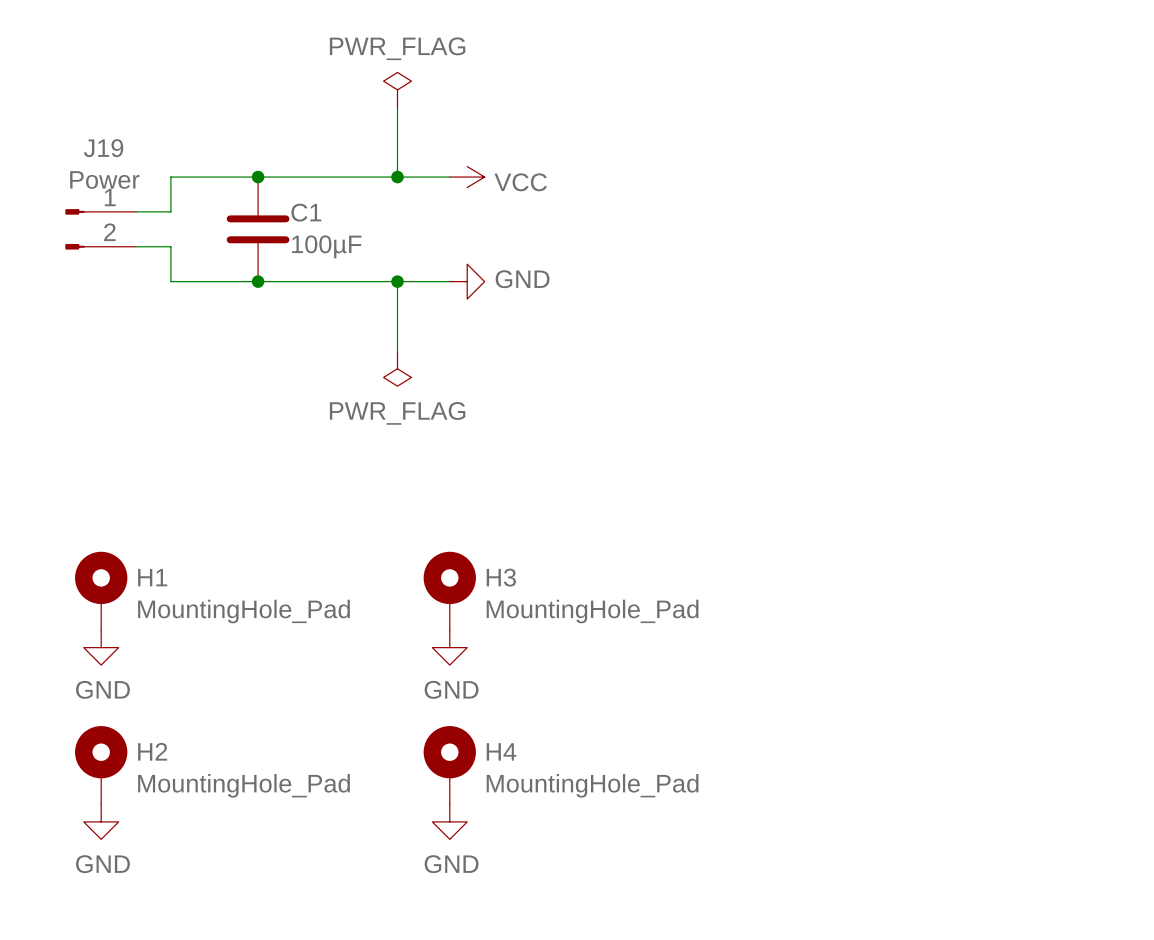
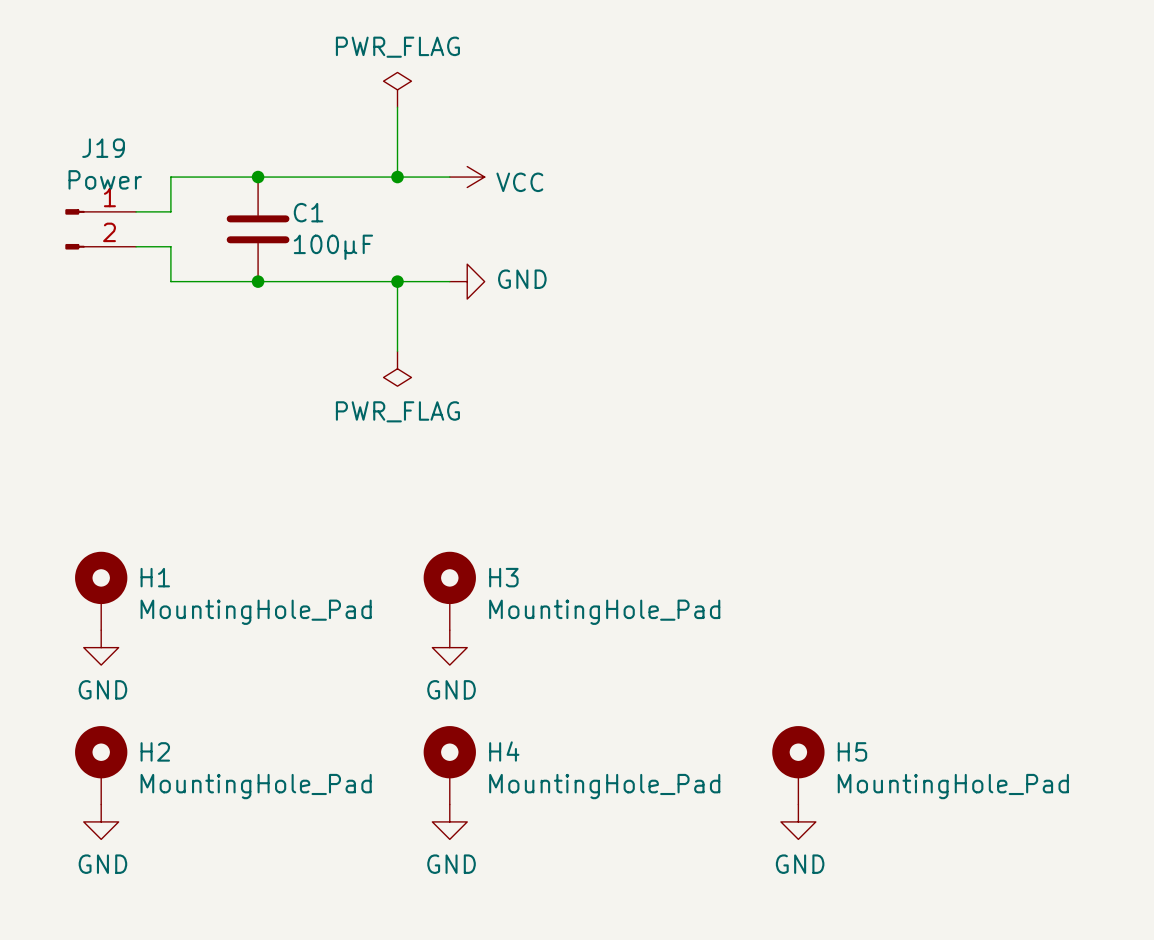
H5: none -> MountingHole_Pad (798, 765)
power symbol: none -> GND (798, 821)

